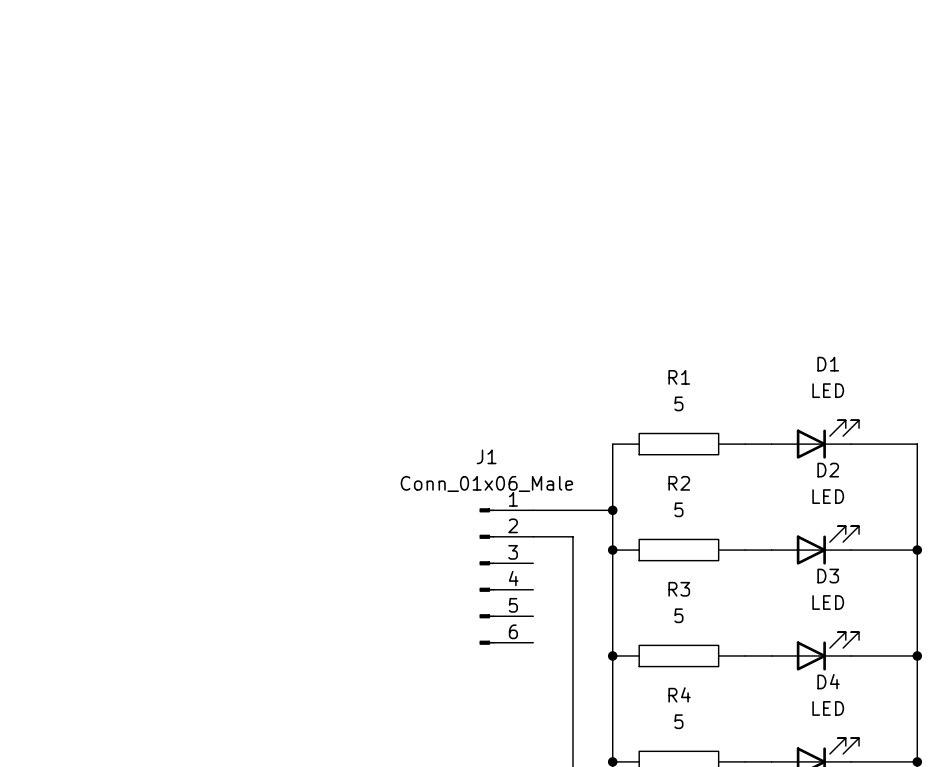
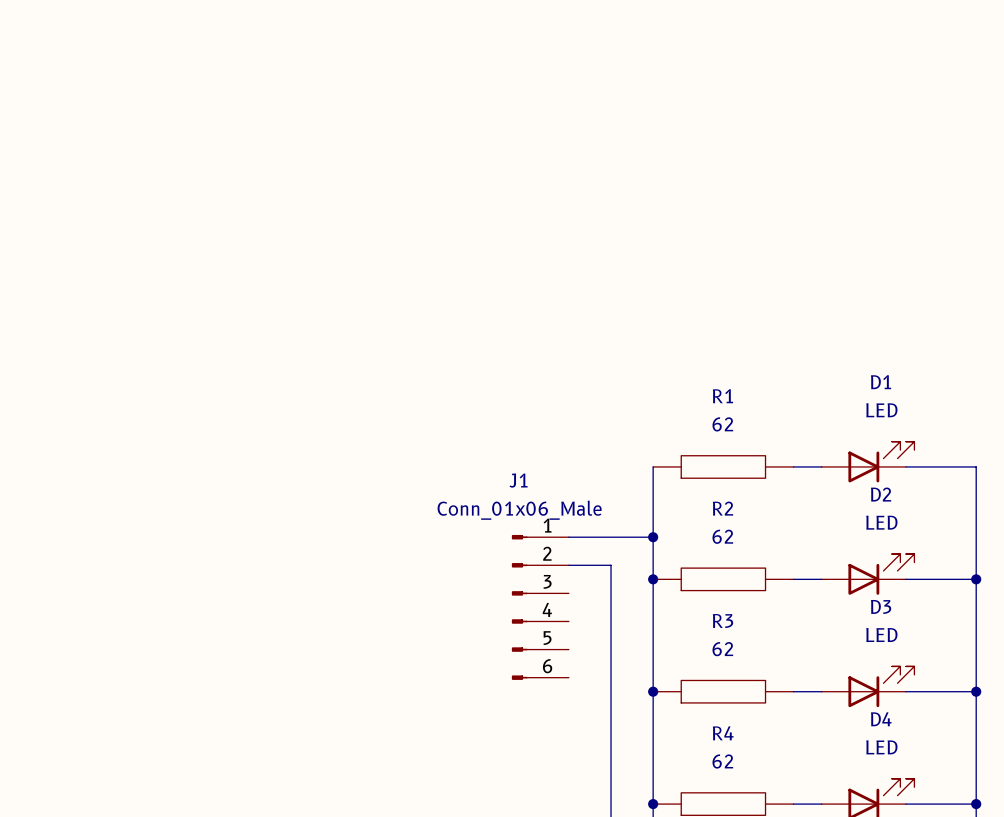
R1 value: 5 (678, 403) -> 62 (722, 424)
R2 value: 5 (678, 509) -> 62 (722, 536)
R3 value: 5 (678, 615) -> 62 (722, 649)
R4 value: 5 (678, 721) -> 62 (722, 761)

